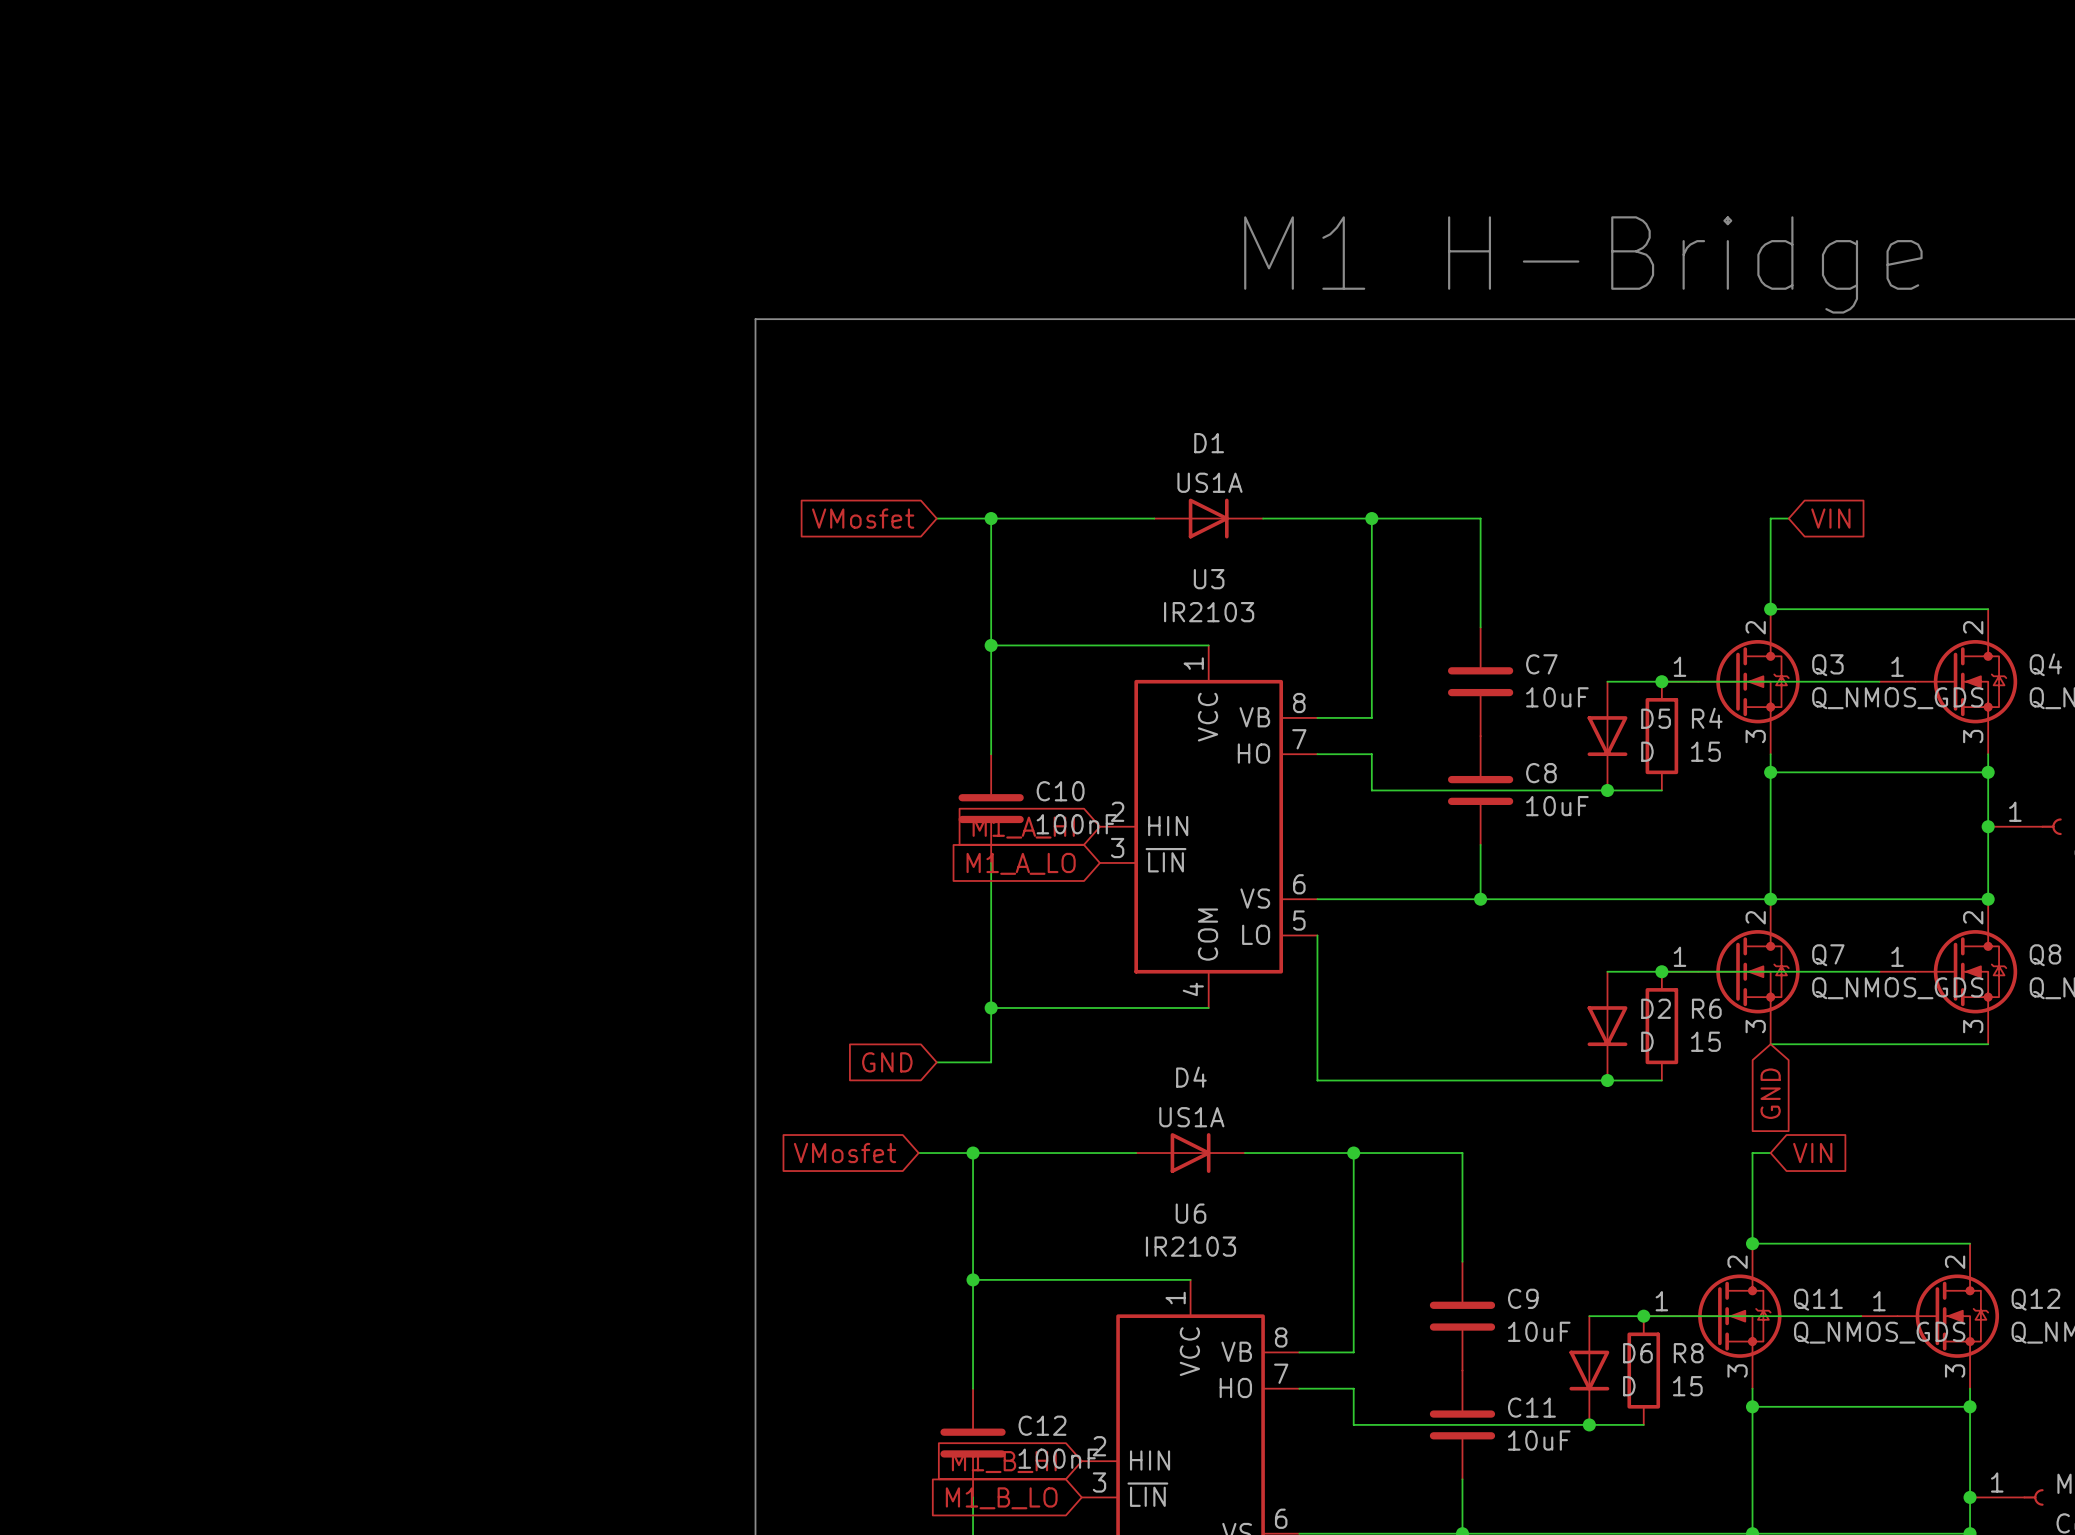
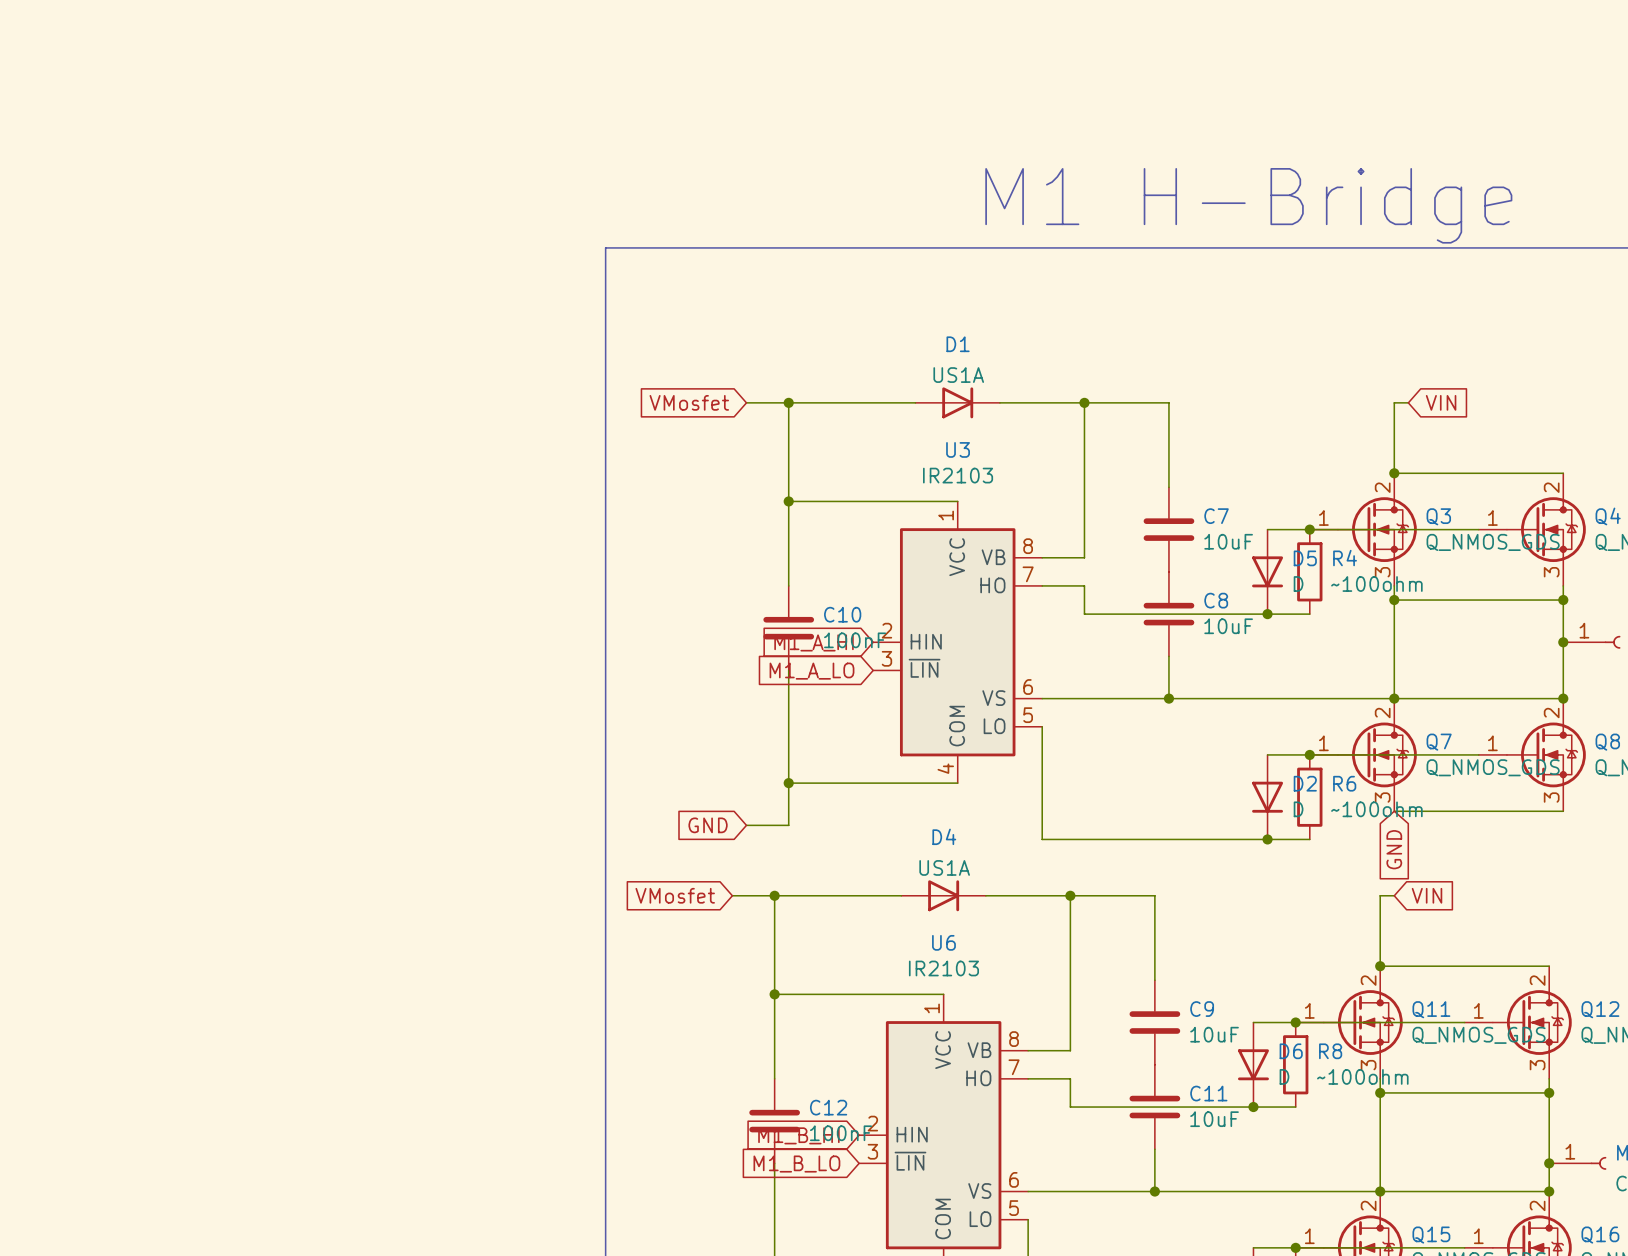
R4 value: 15 (1705, 751) -> ~100ohm (1376, 584)
R6 value: 15 (1705, 1041) -> ~100ohm (1376, 809)
R8 value: 15 (1687, 1386) -> ~100ohm (1362, 1076)

